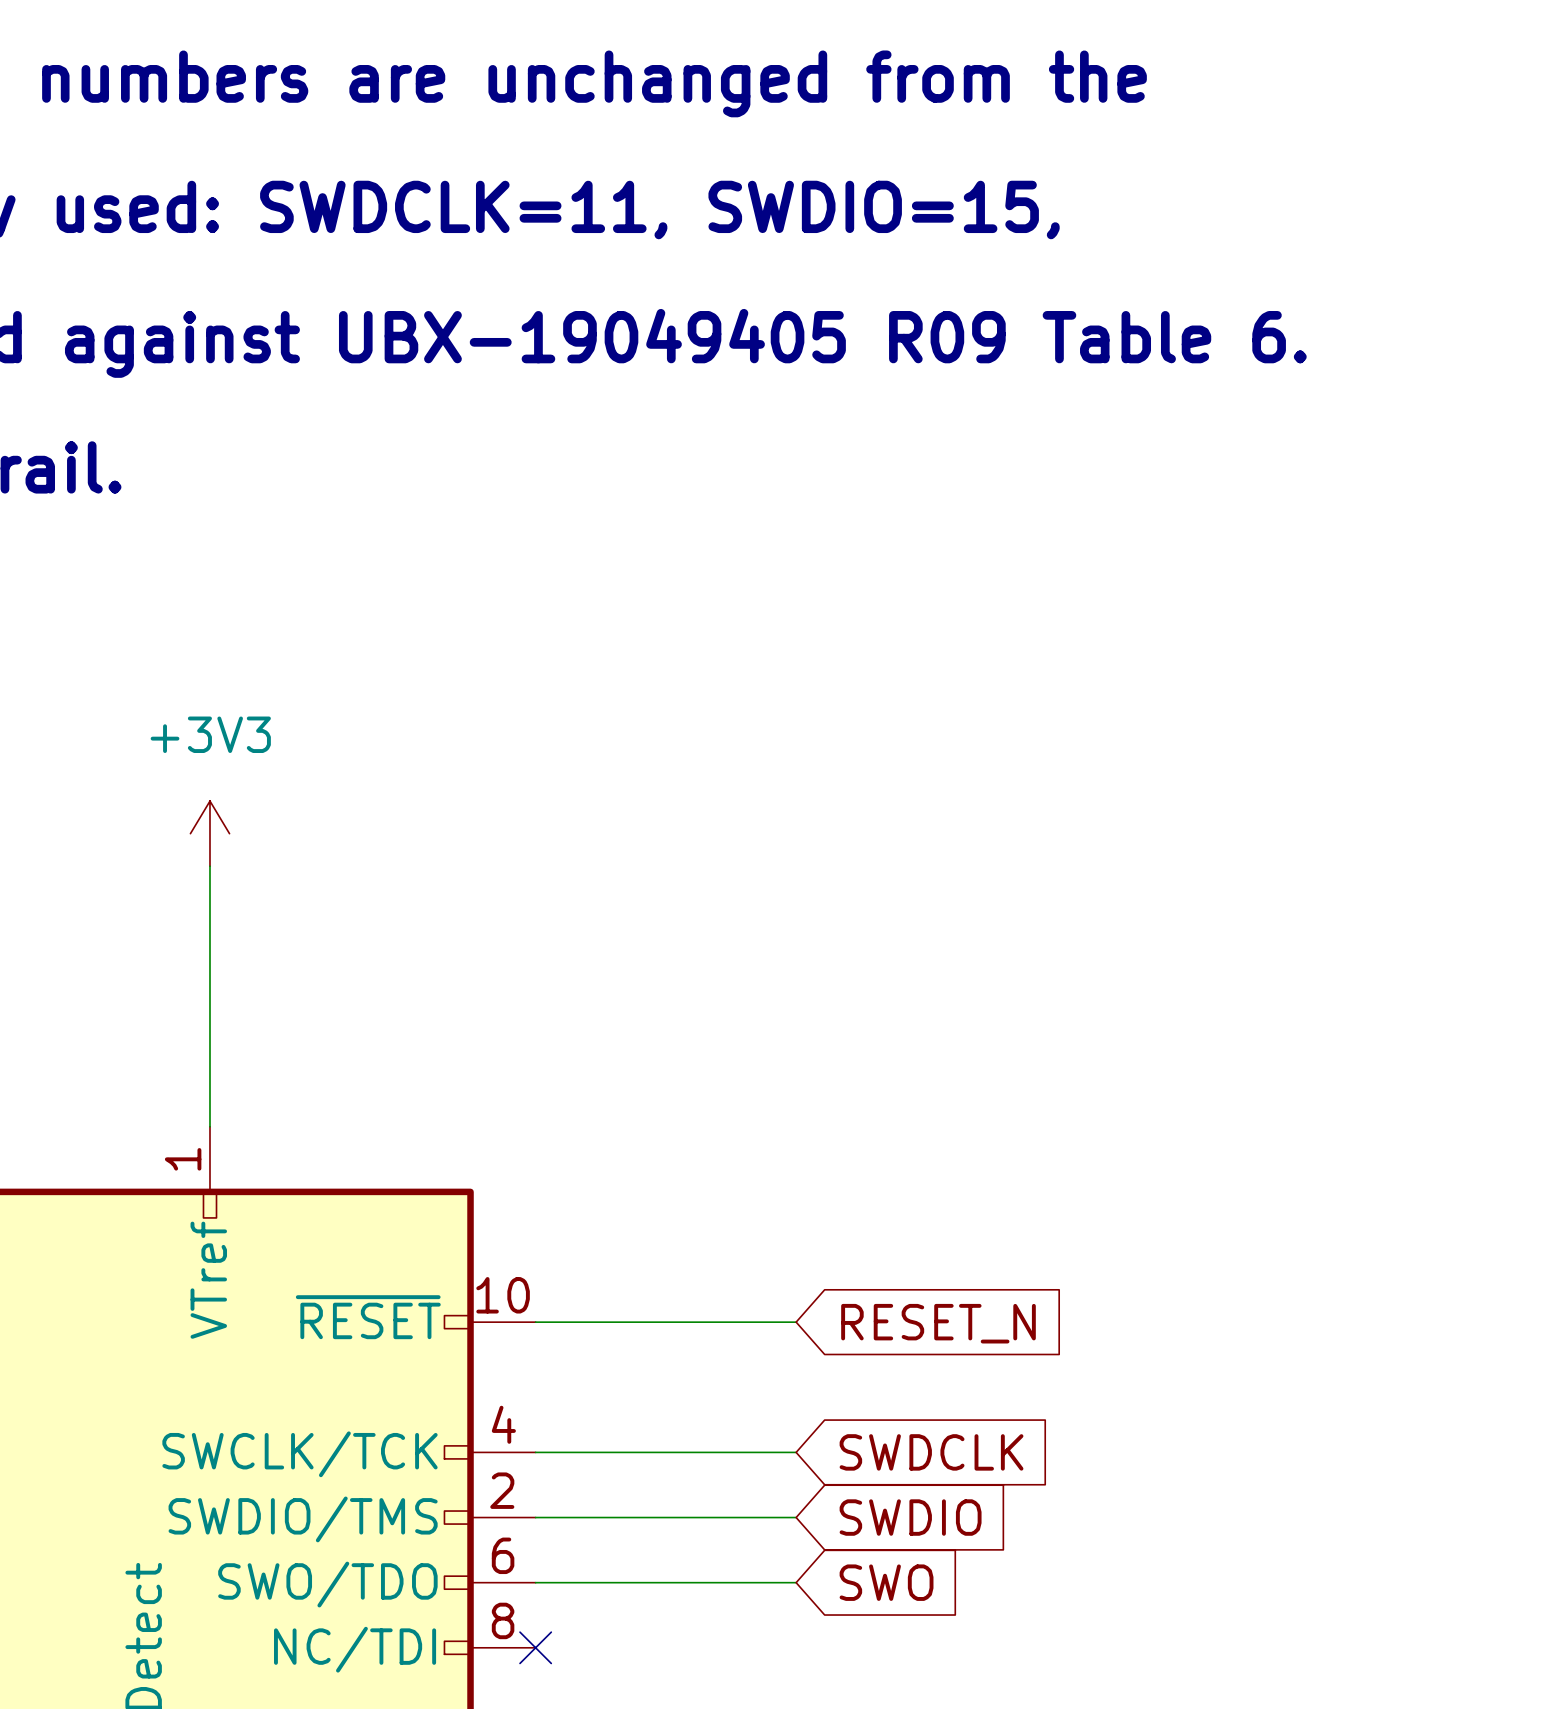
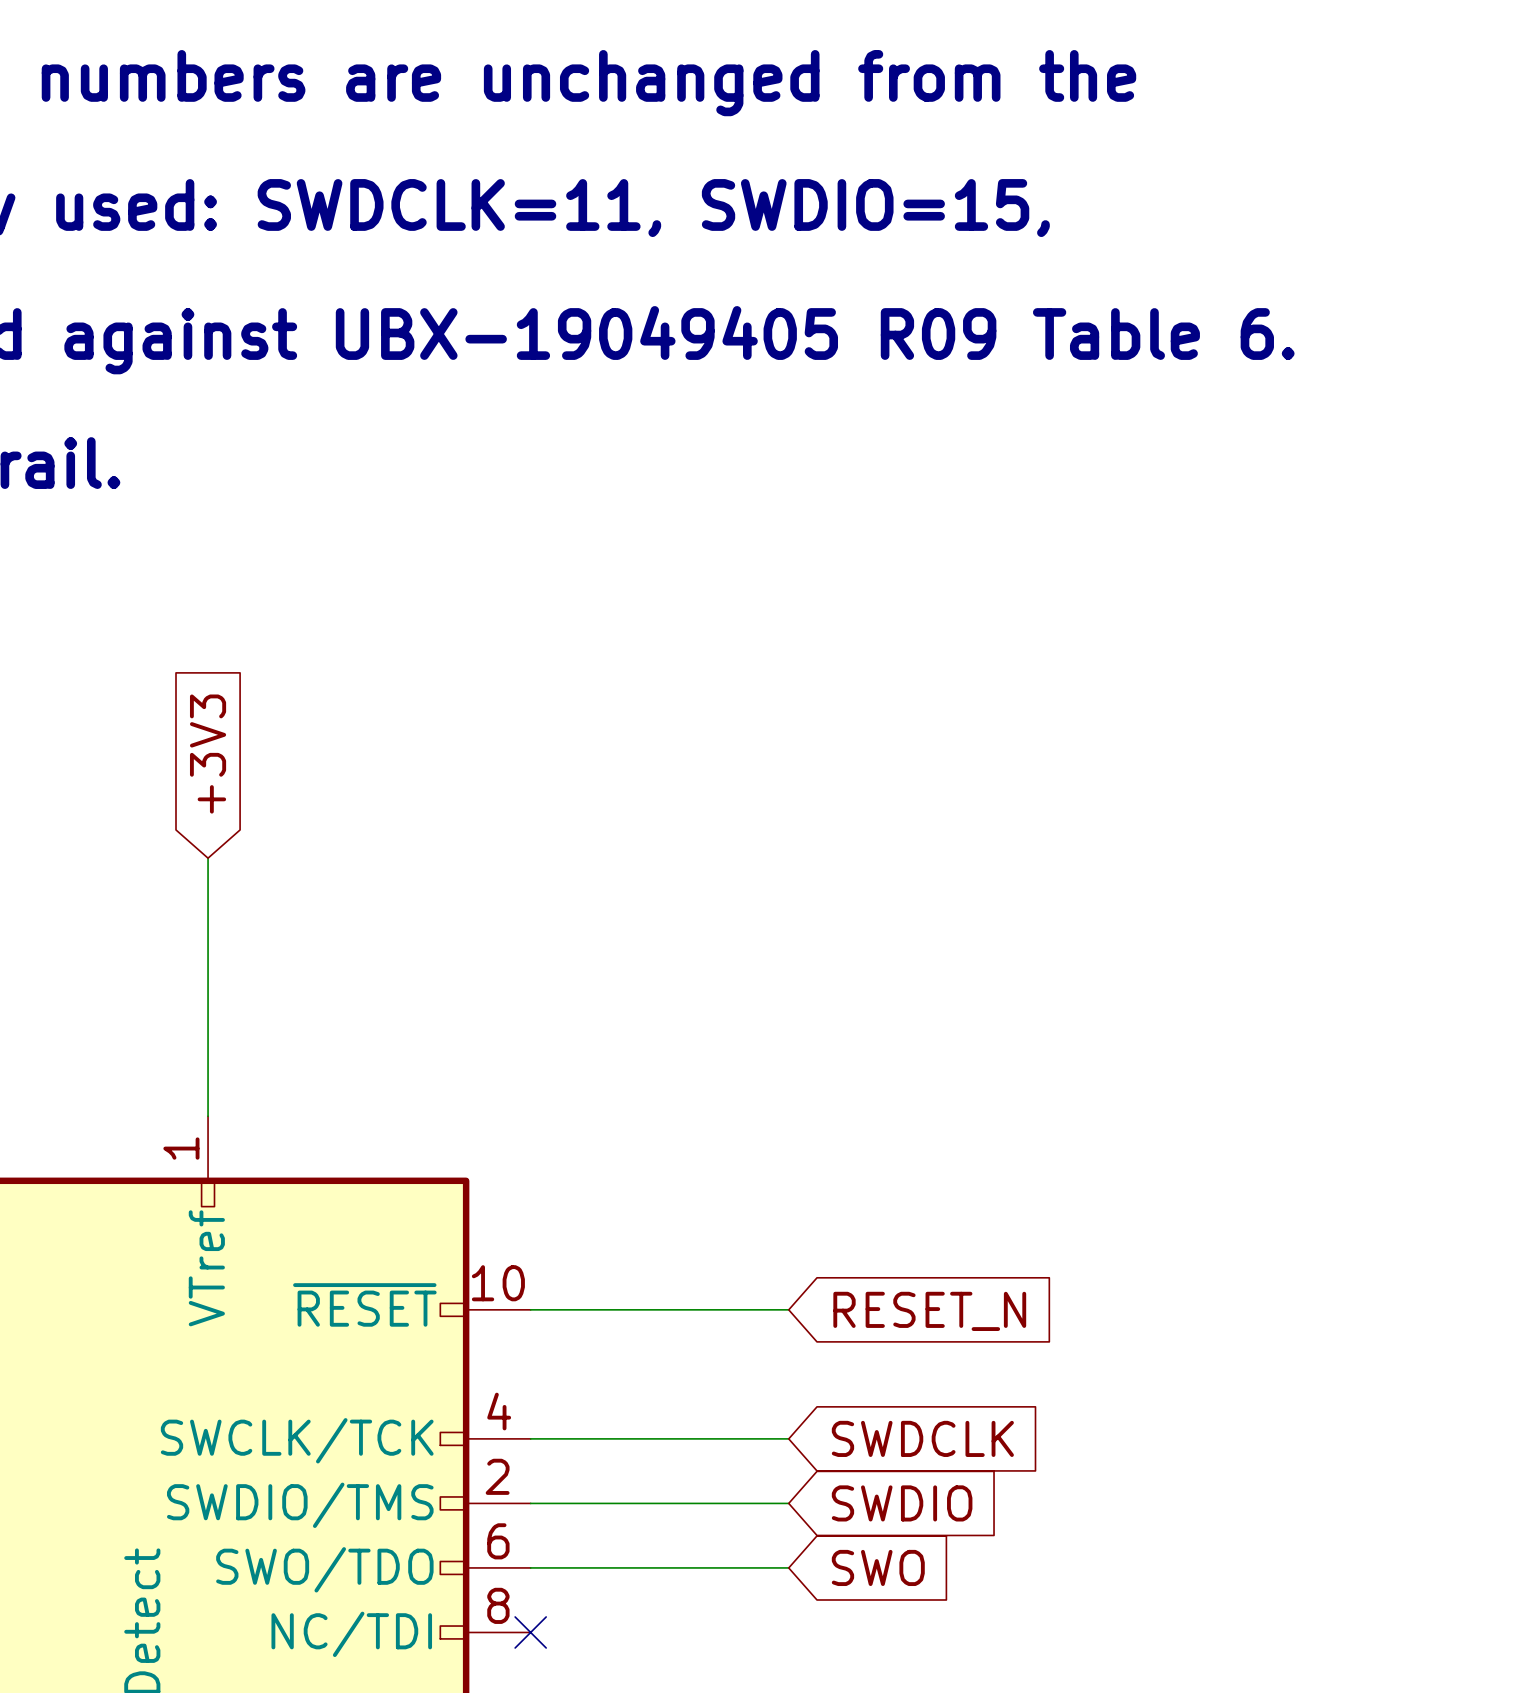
global label: none -> +3V3 (208, 754)
power symbol: +3V3 (209, 833) -> none

